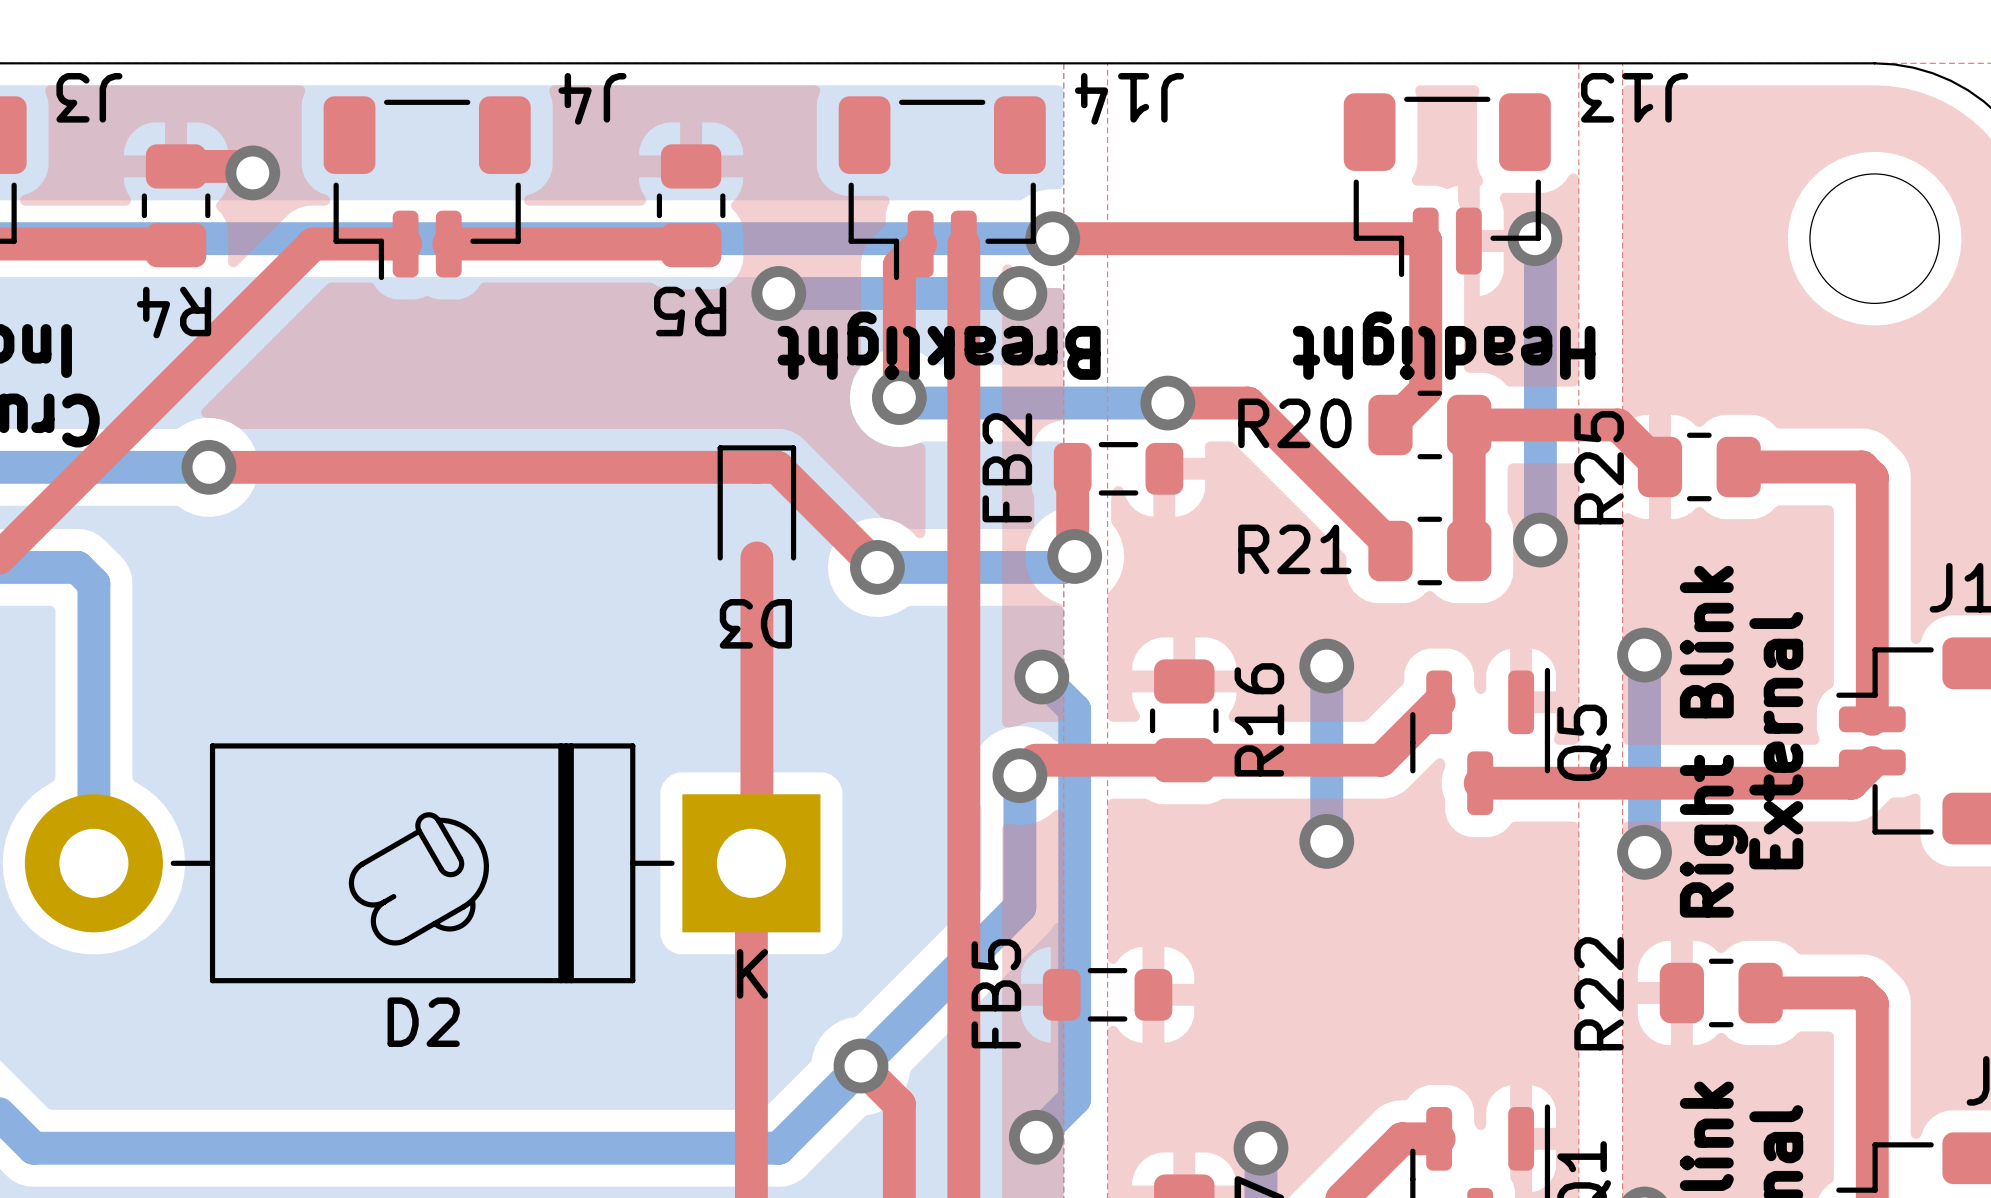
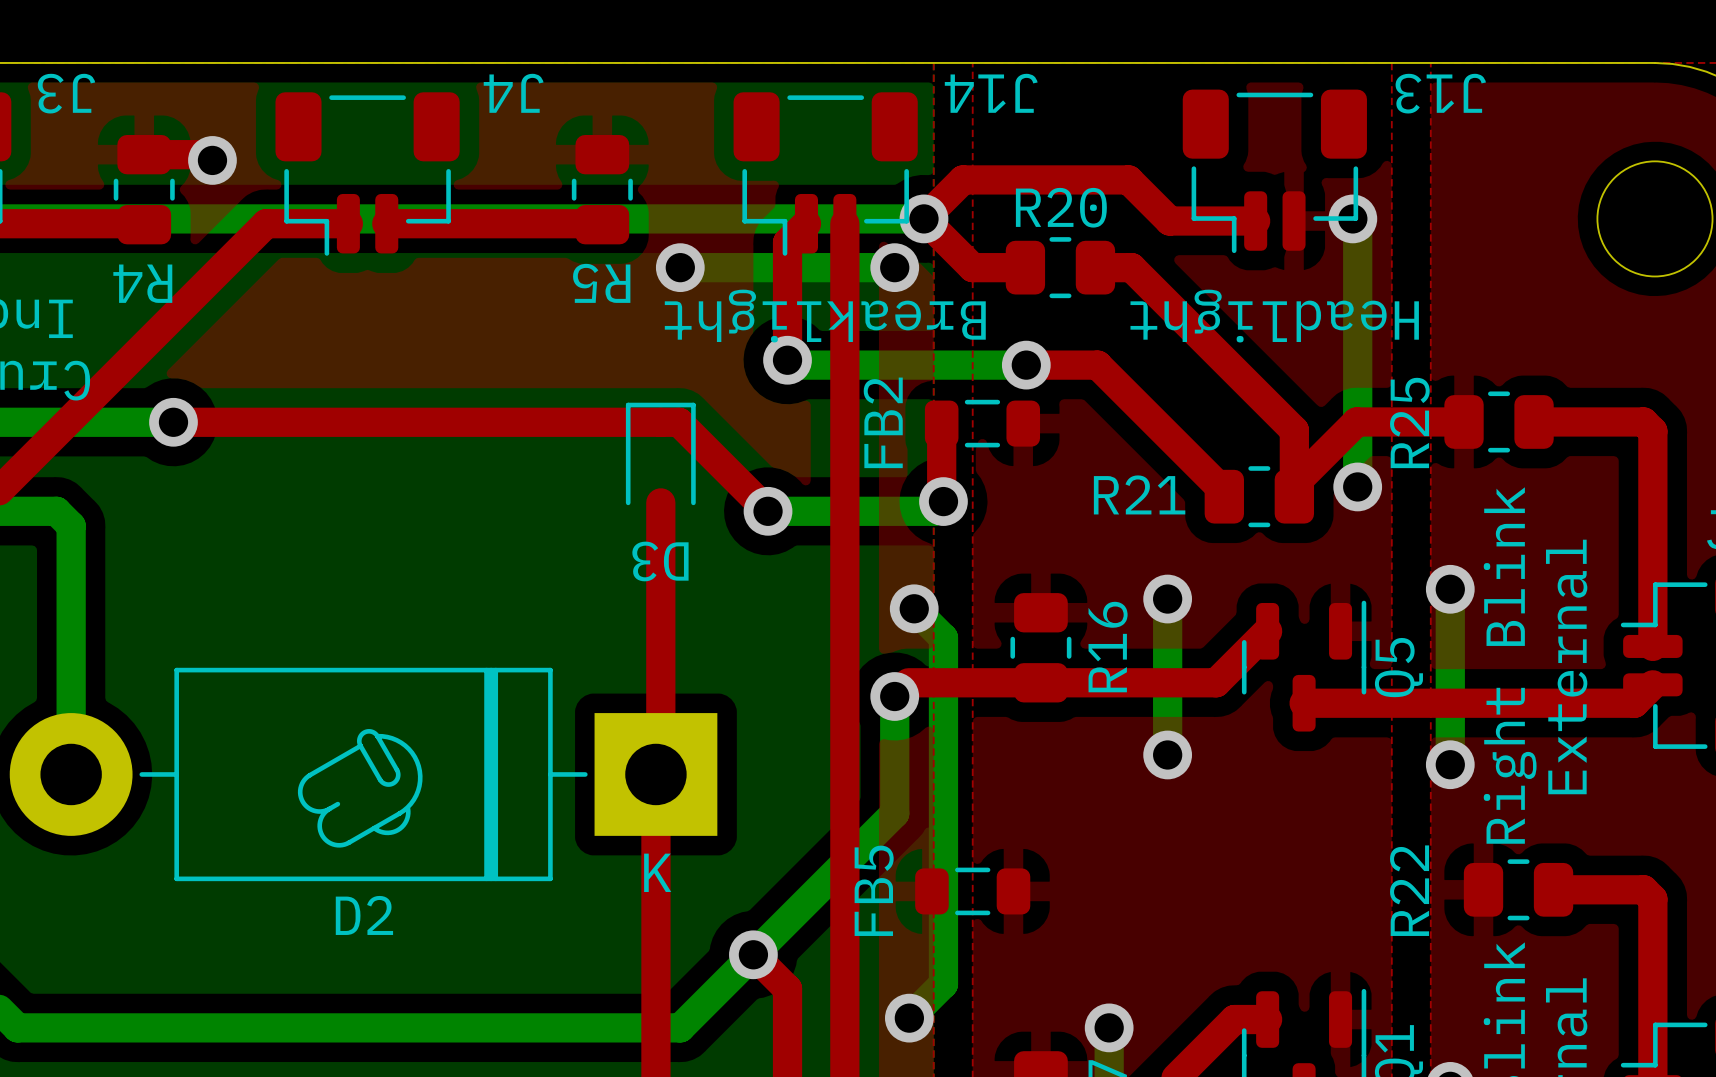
top track: (1052, 238) (1423, 238) (1425, 241) (1425, 389) (1390, 424) -> none
top track: none -> (1255, 221) (1169, 221) (1128, 179) (962, 179) (923, 218) (972, 267) (1025, 267)
top track: none -> (1095, 267) (1131, 267) (1294, 430)
R20 name position: R20 (1294, 423) -> R20 (1061, 207)
R20 position: (1429, 424) -> (1060, 267)
top track: (1659, 466) (1617, 424) (1469, 424) (1469, 476) -> (1464, 421) (1356, 421) (1294, 484)

